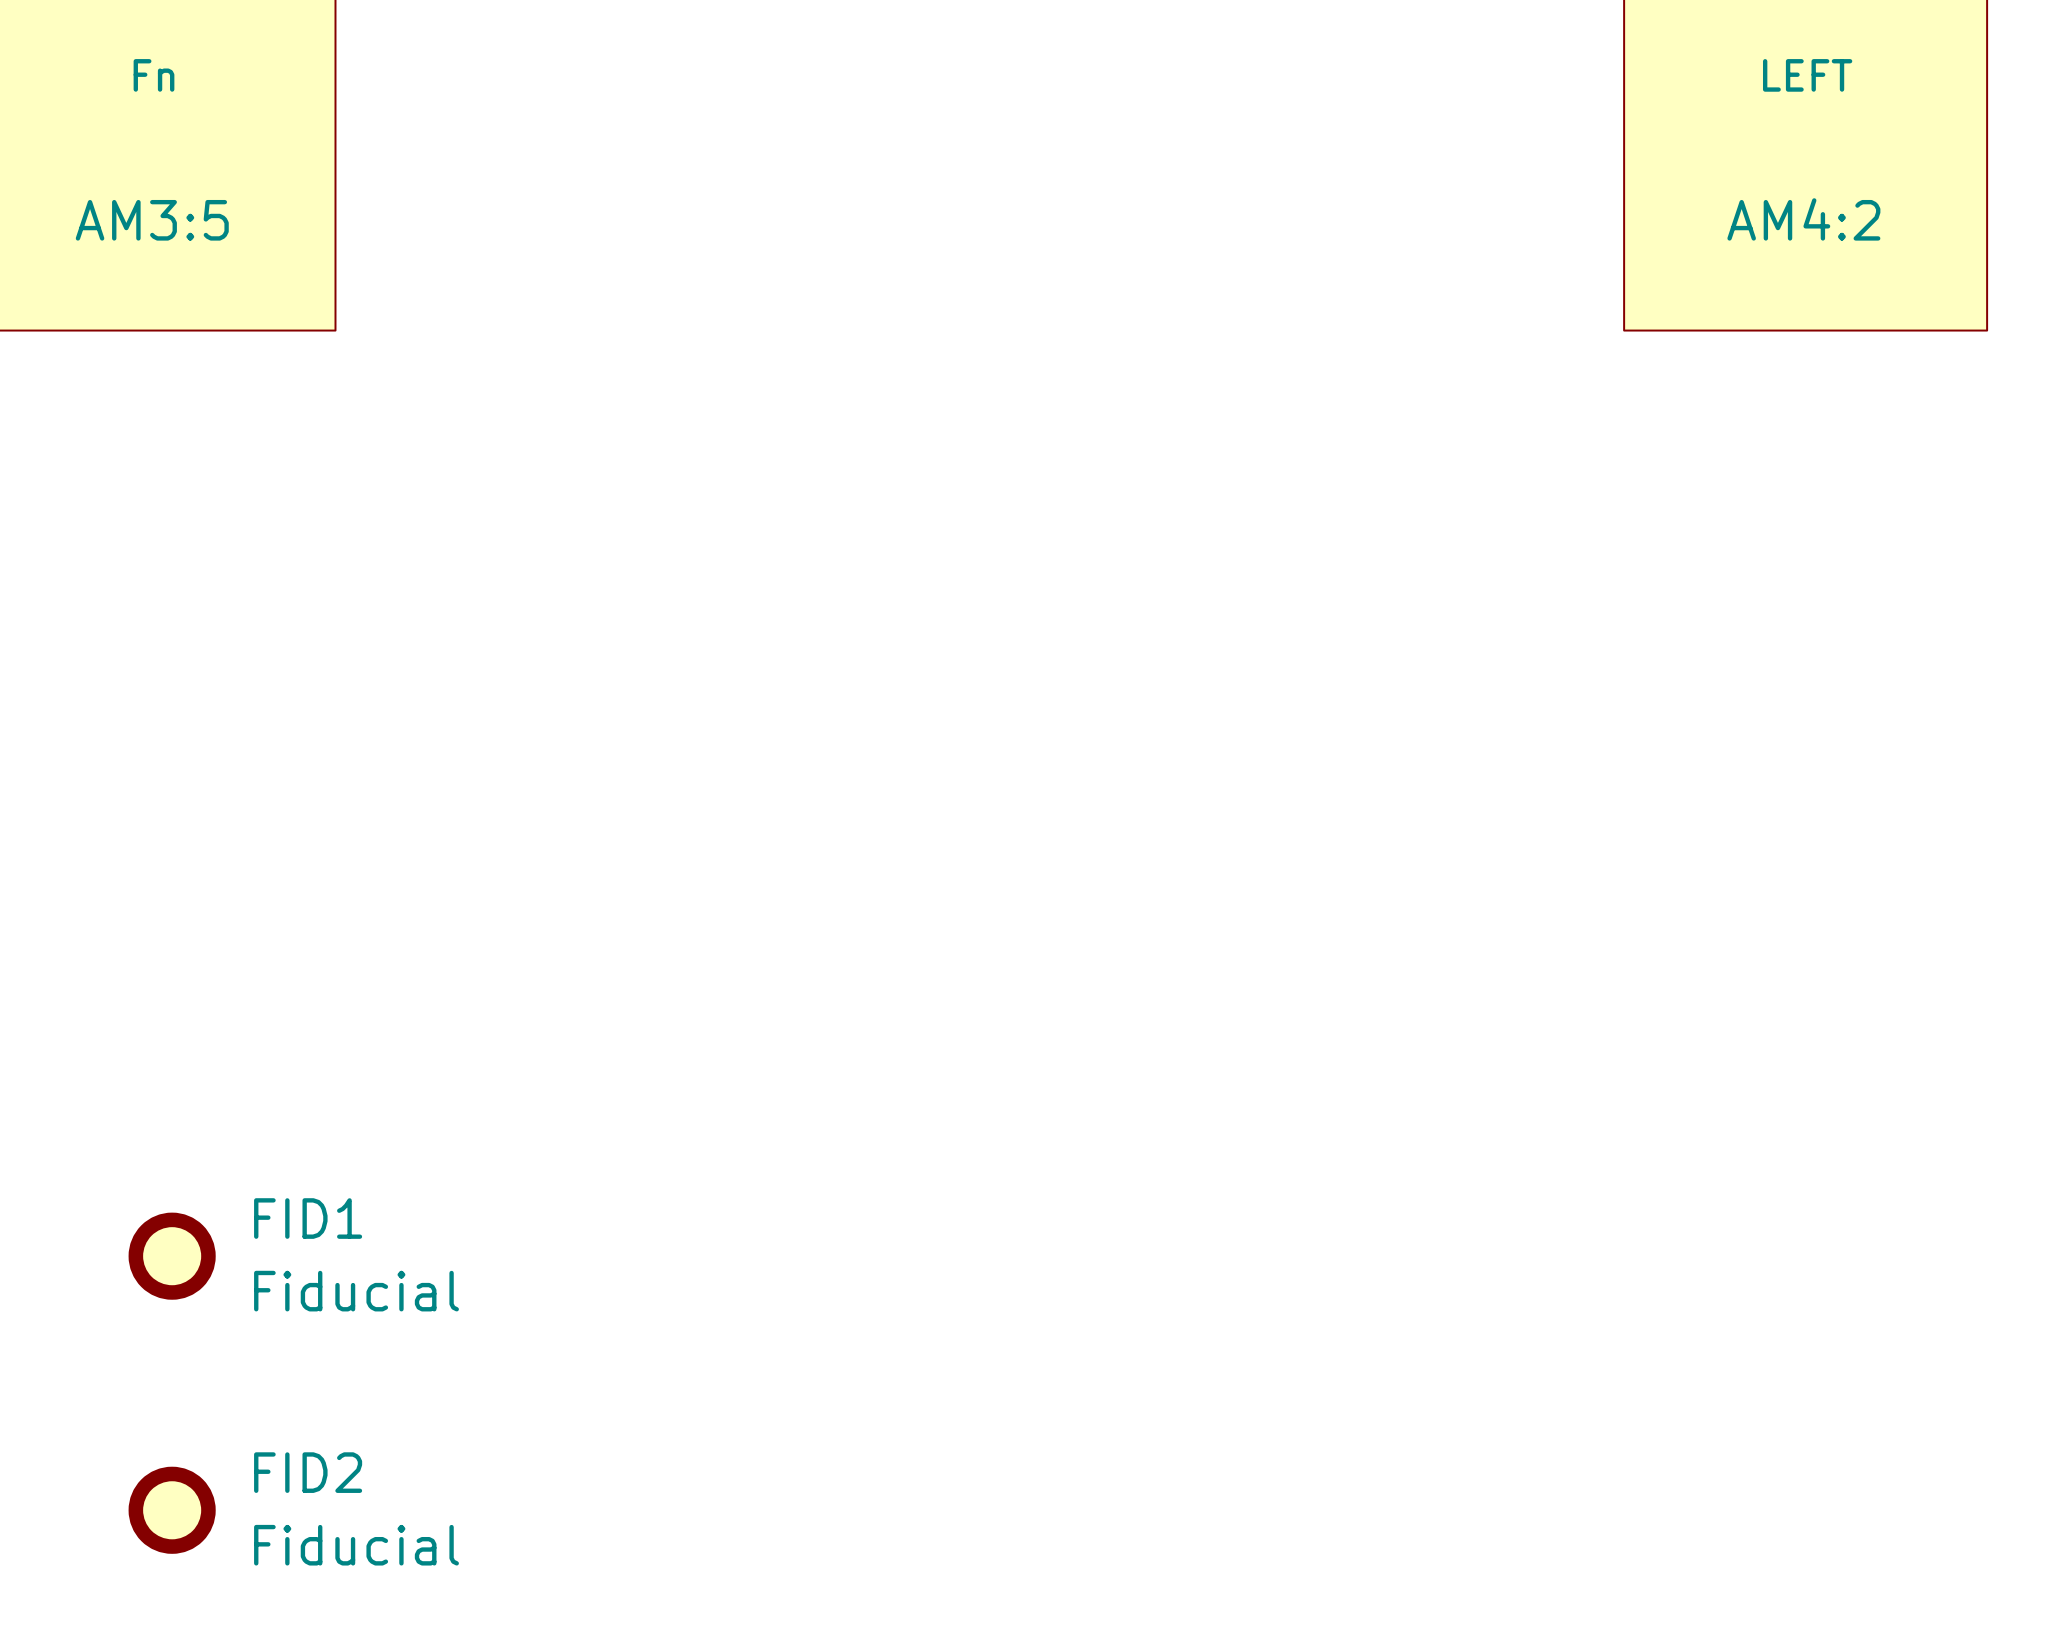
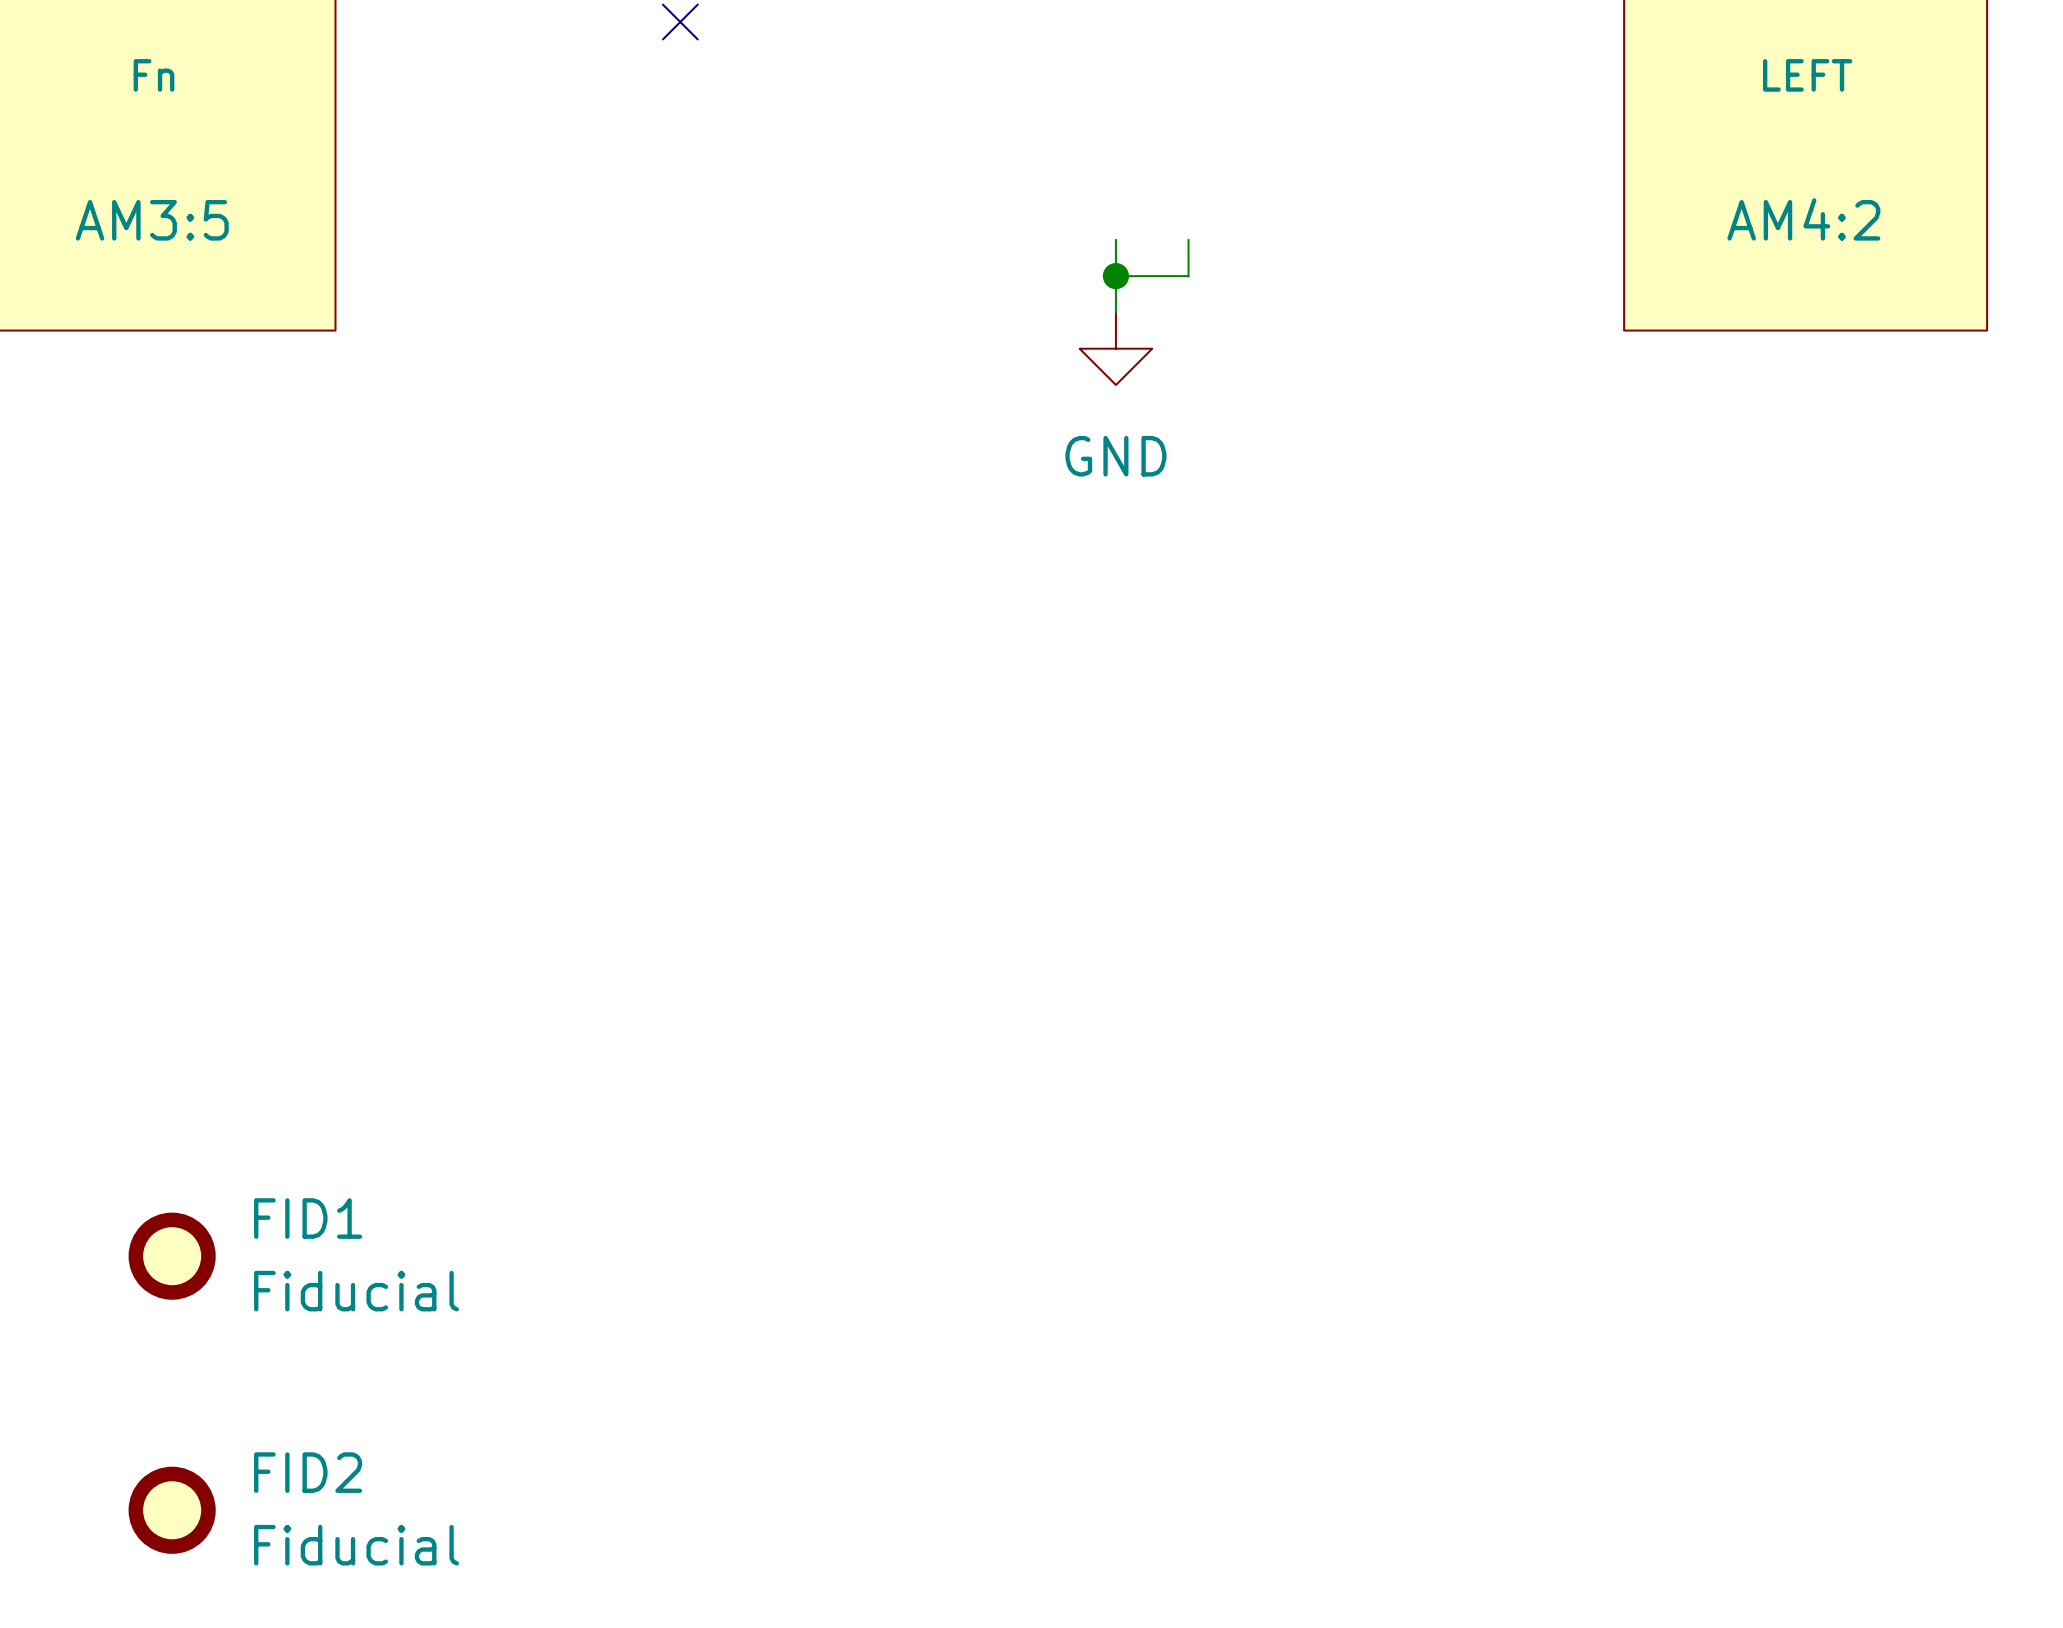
no-connect mark: none -> (680, 22)
wire: none -> (1115, 239) (1115, 312)
wire: none -> (1188, 239) (1188, 276) (1115, 276)
junction: none -> (1115, 276)
power symbol: none -> GND (1115, 348)

